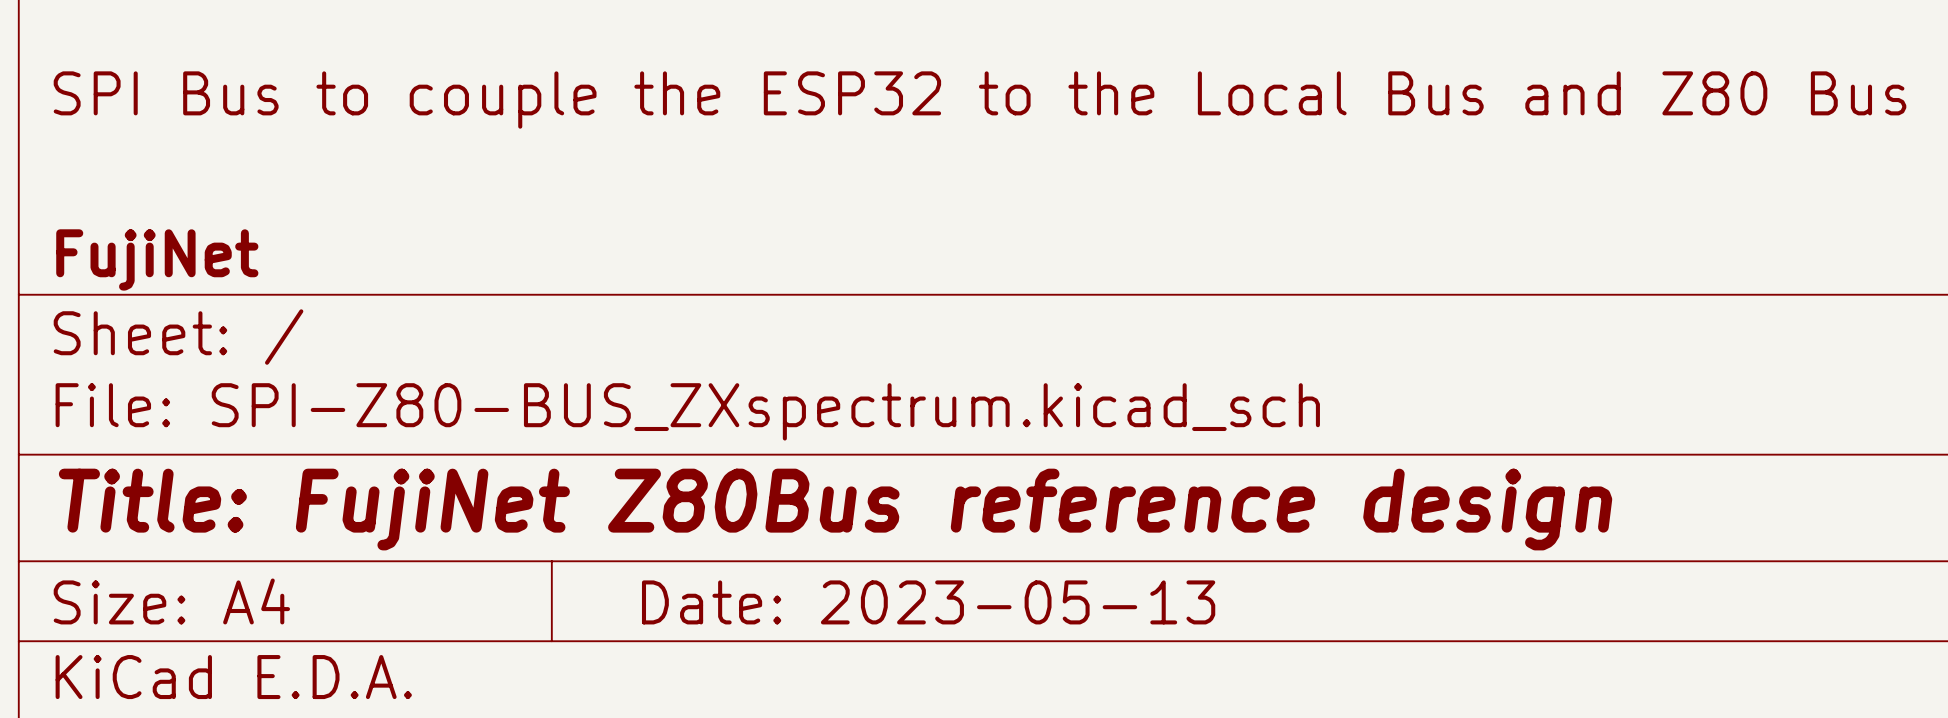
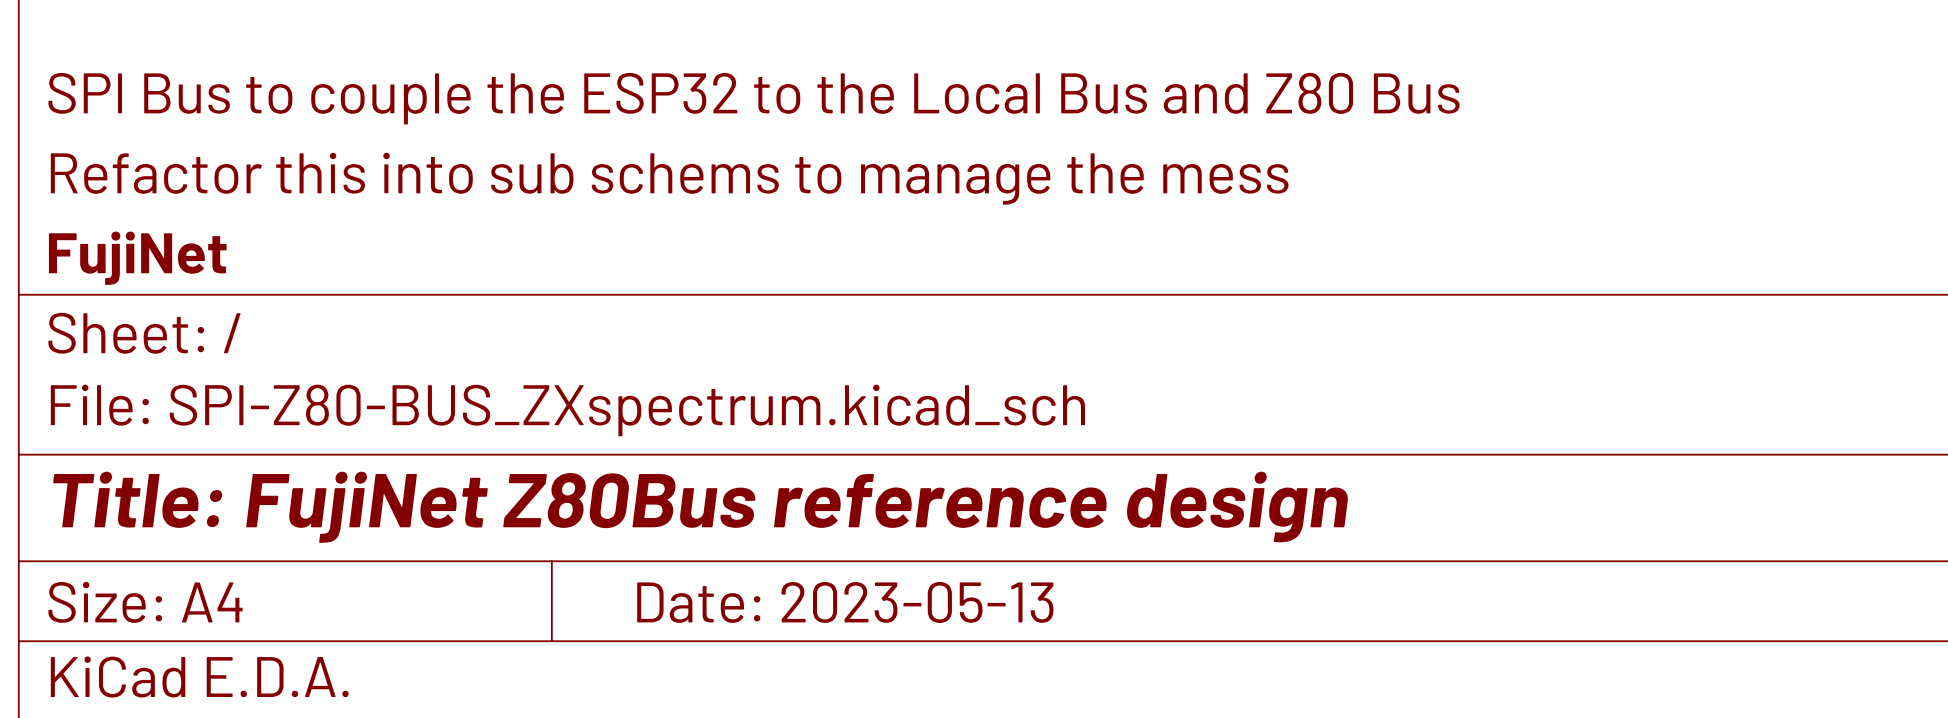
title block: none -> Refactor this into sub schems to manage the mess (669, 178)

